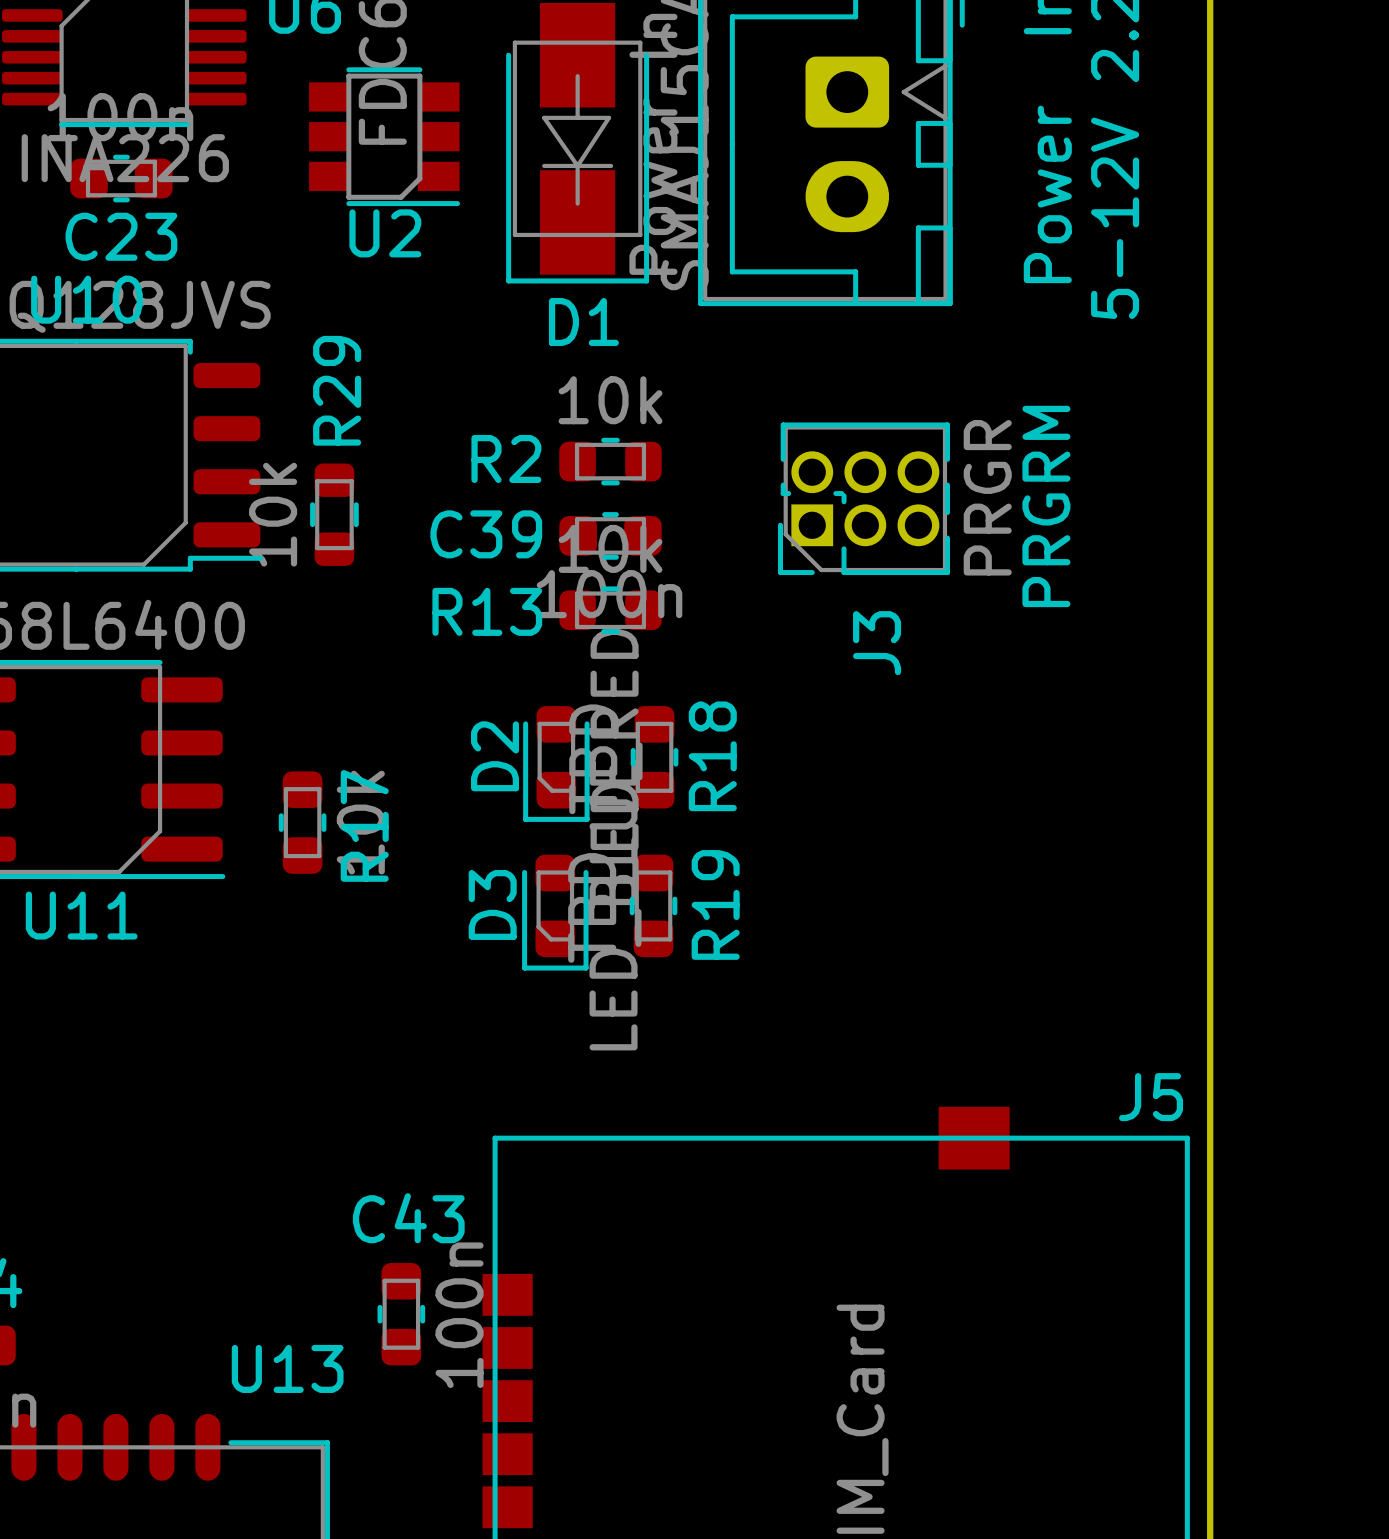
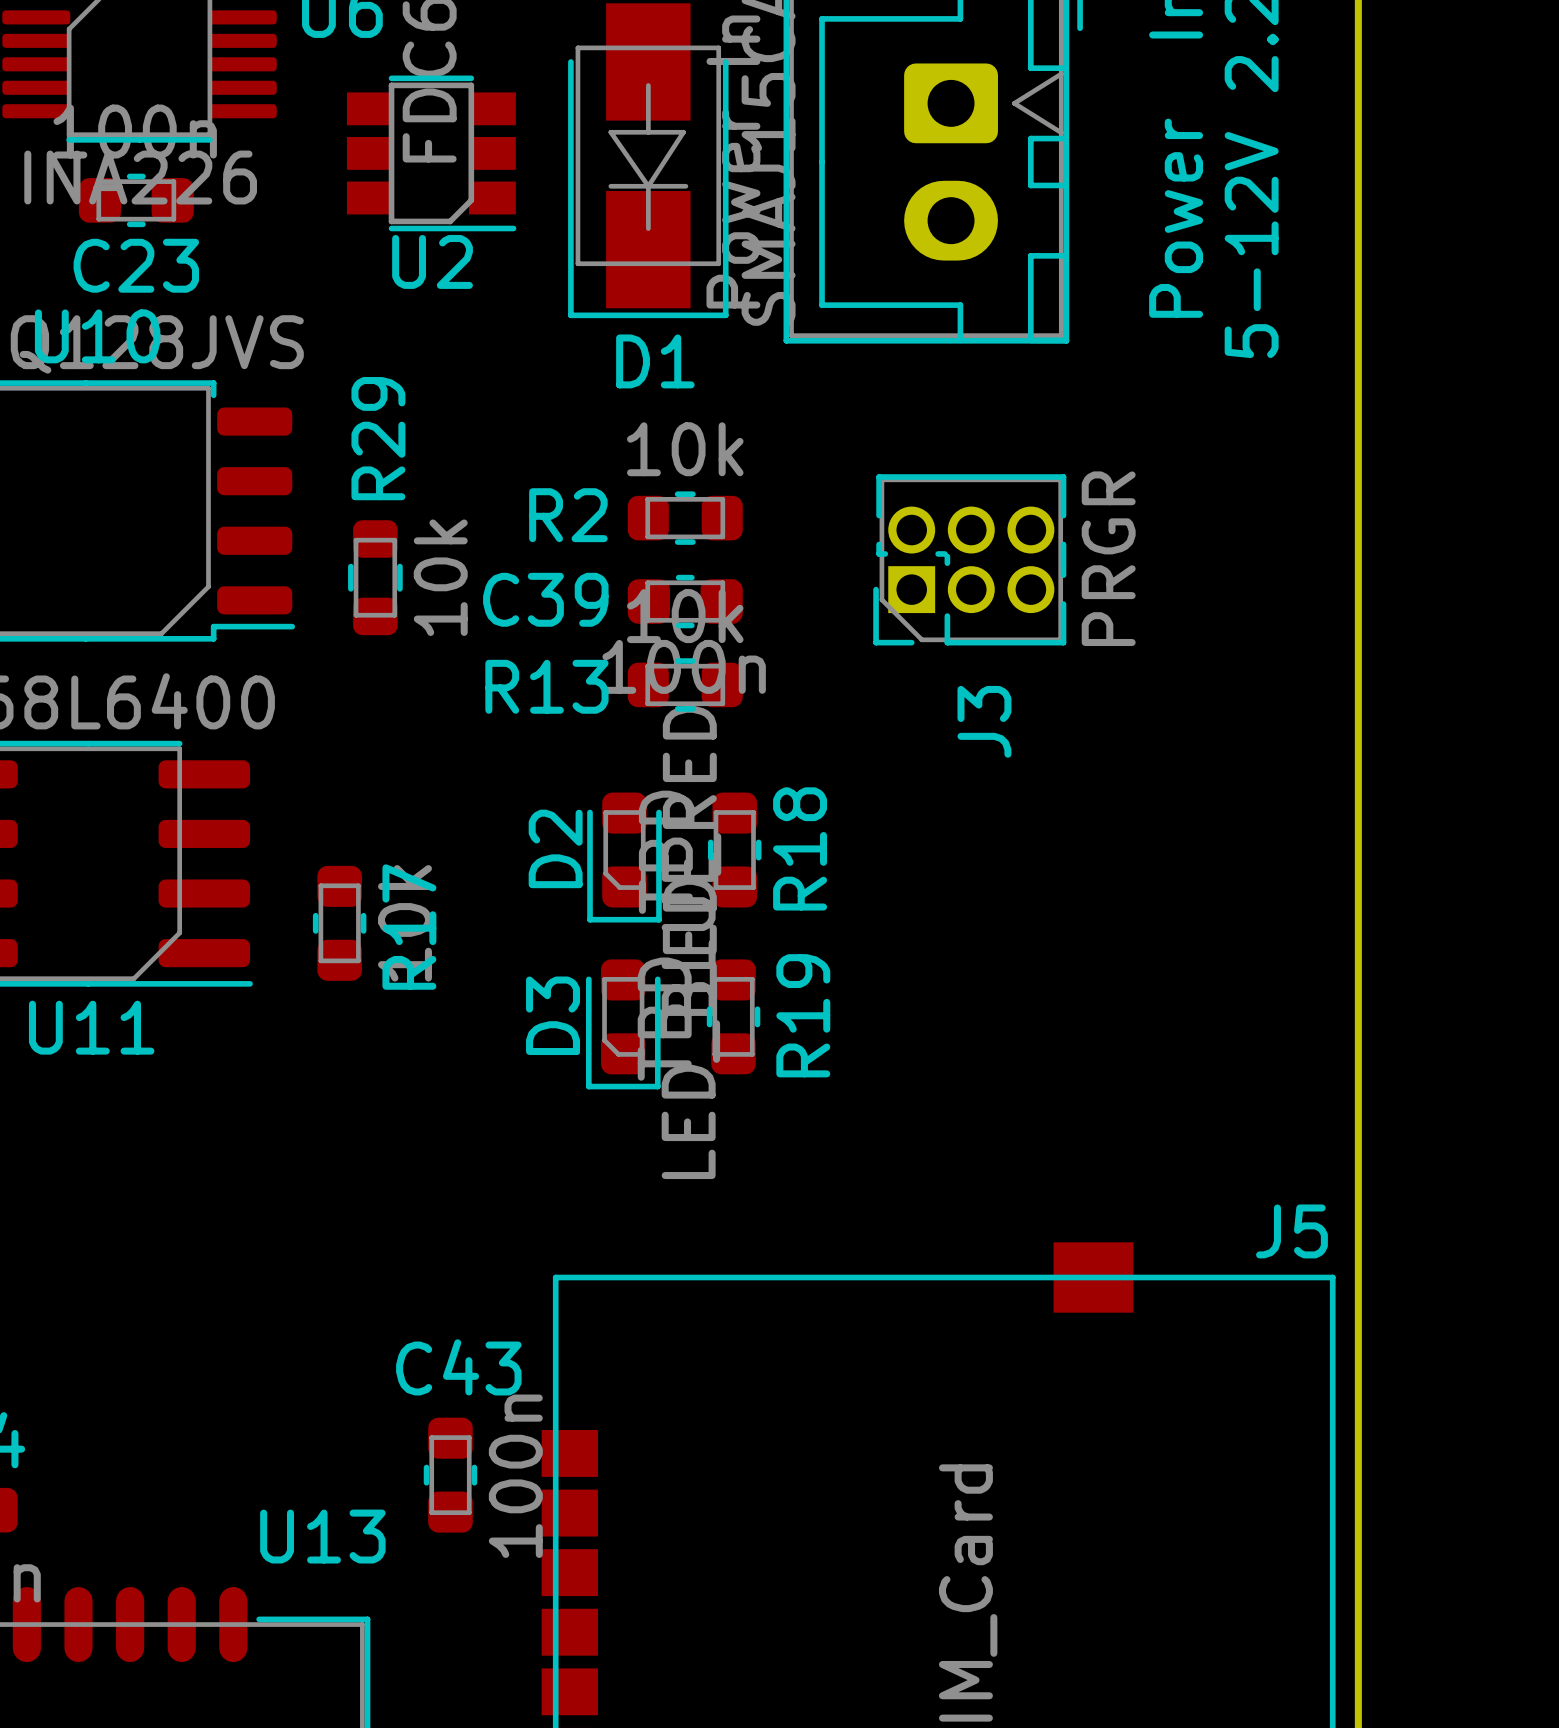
text: PRGRM (1046, 506) -> none
R29 value position: 10k (273, 514) -> 10k (440, 577)

